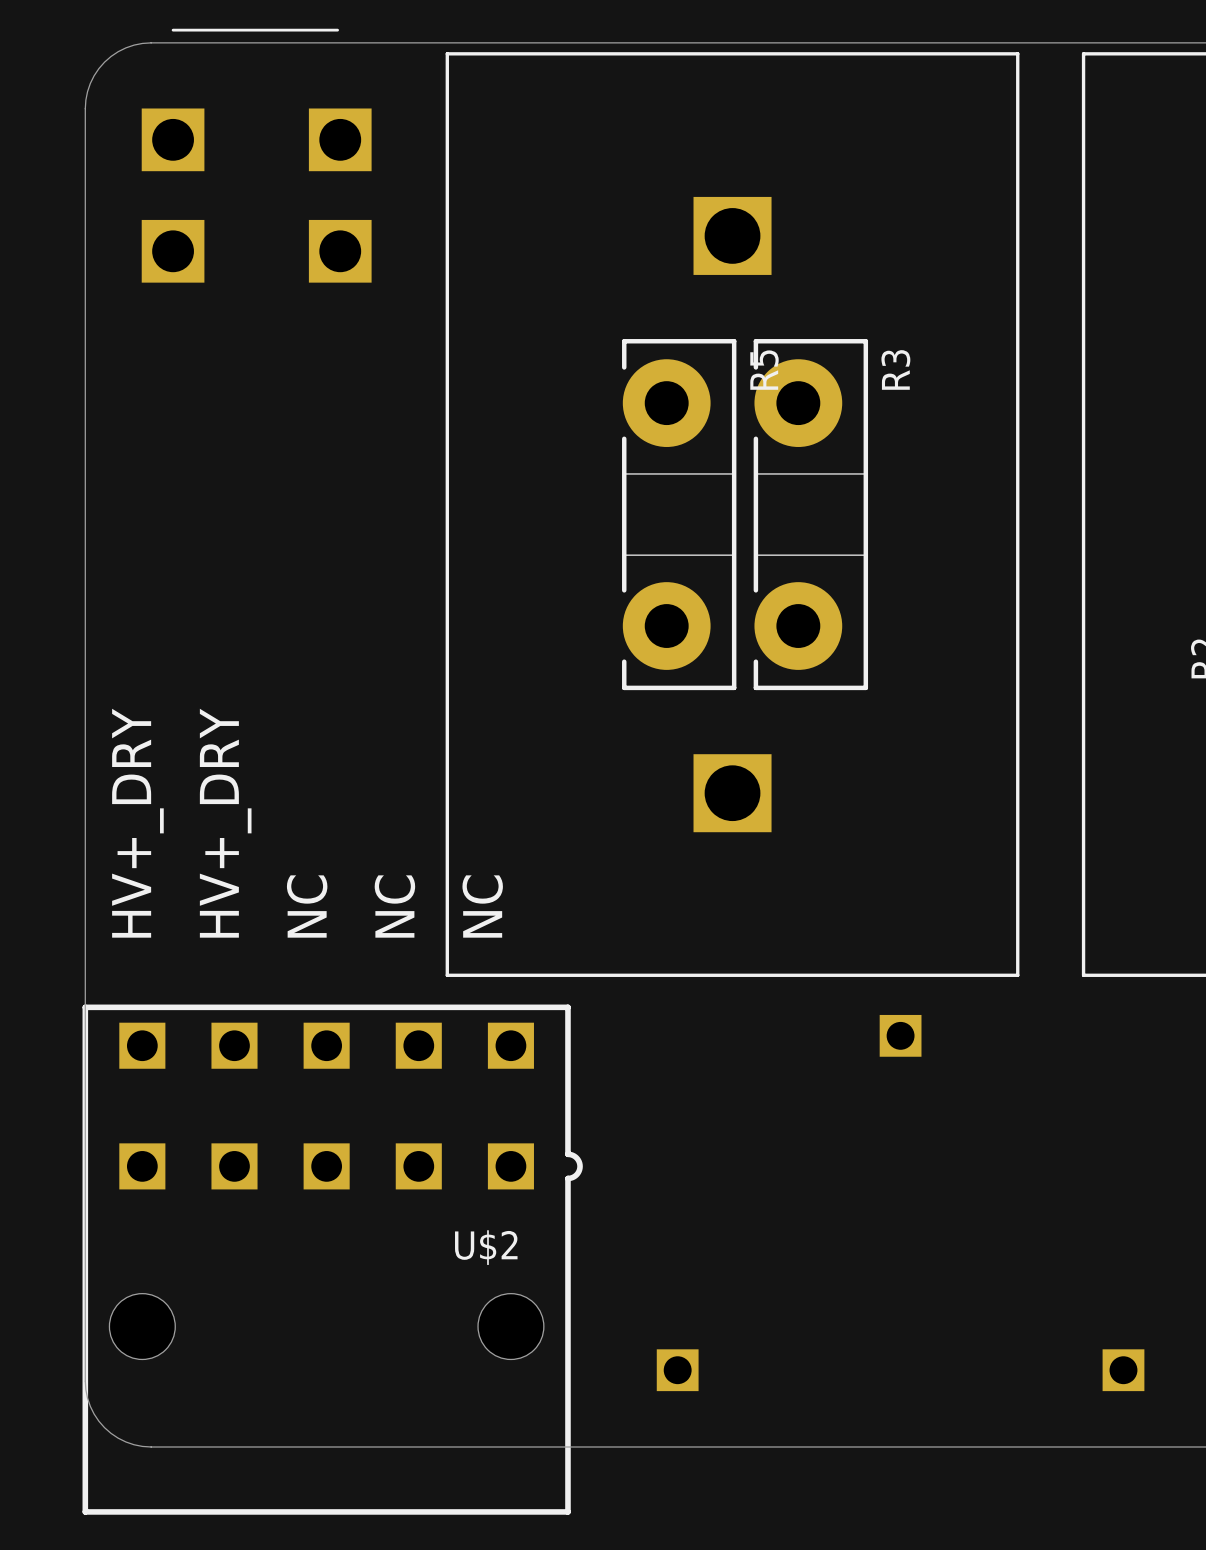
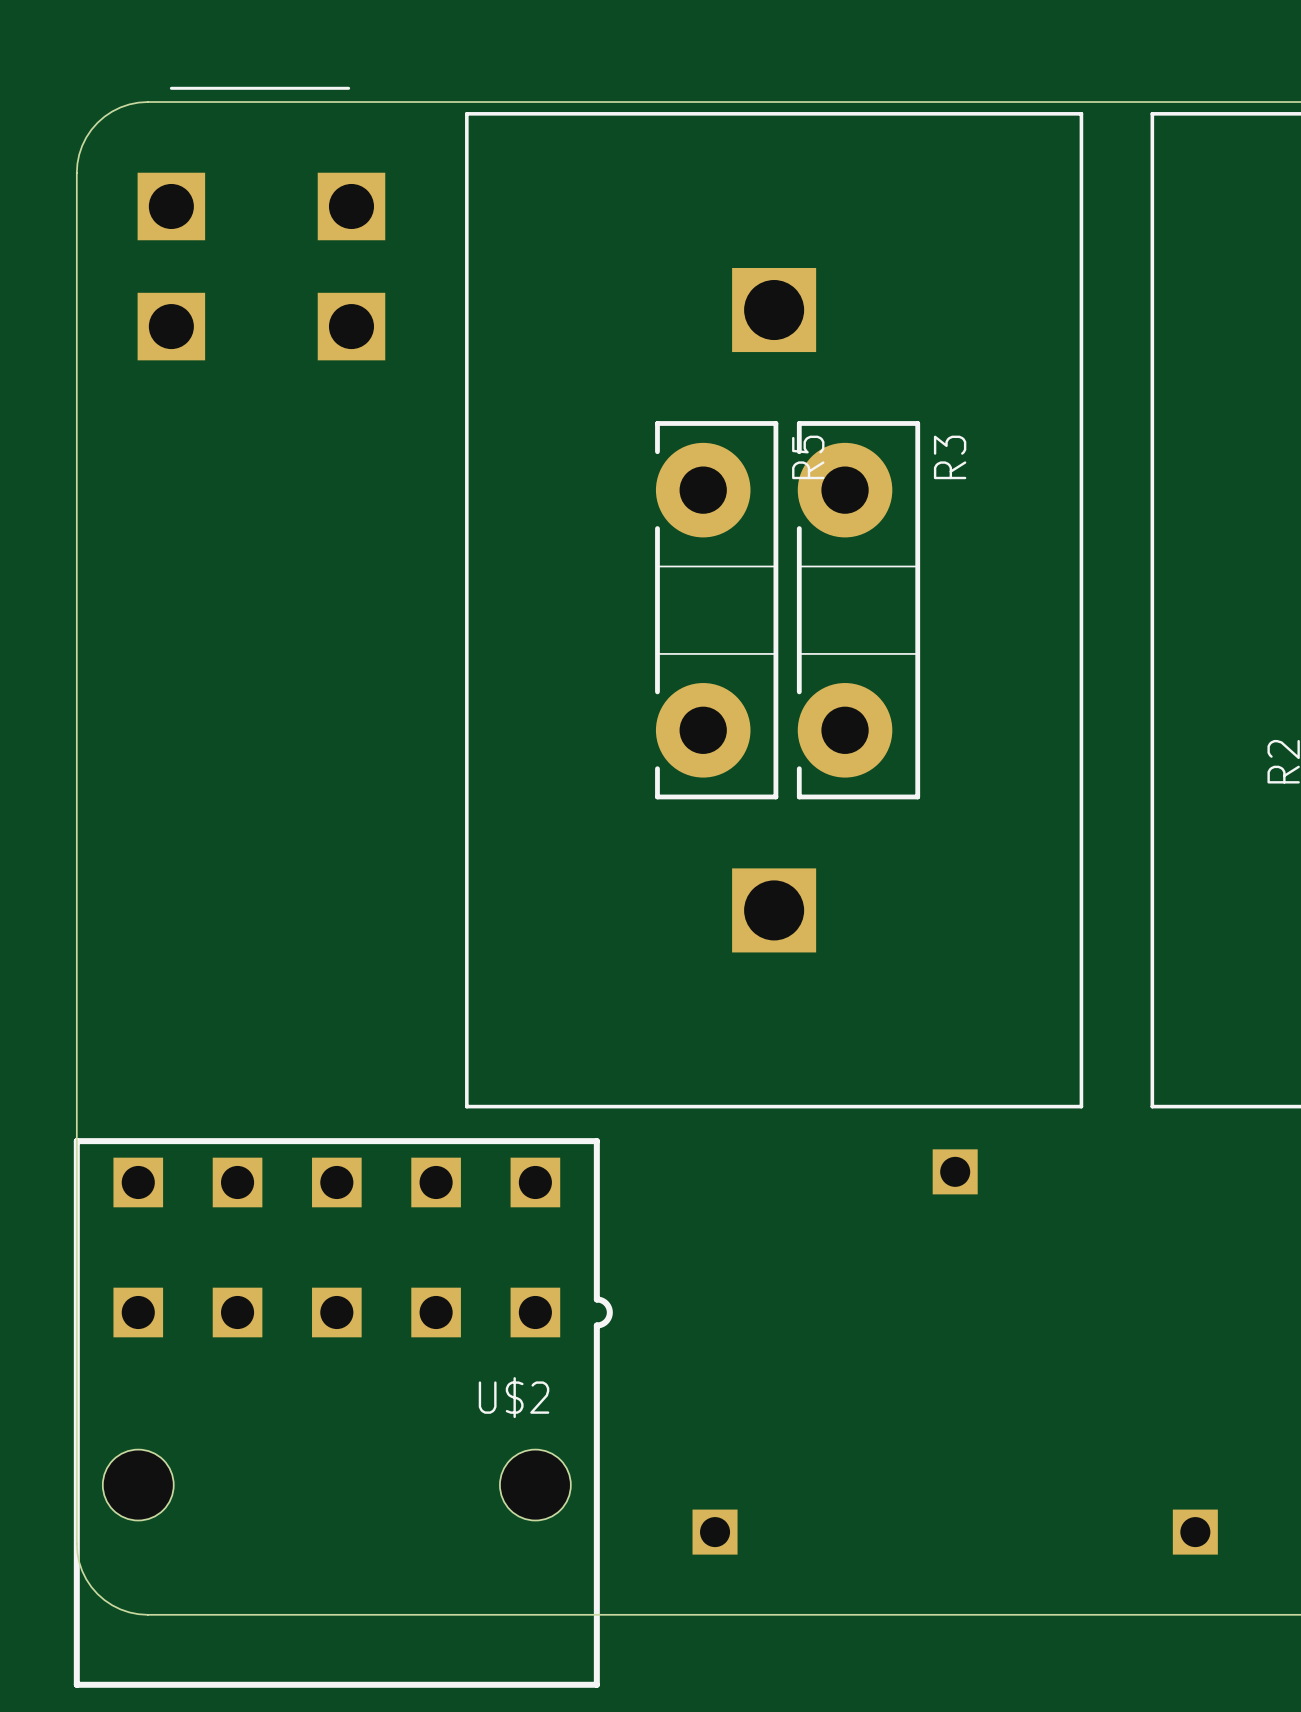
text: HV+_DRY (137, 823) -> none
text: HV+_DRY (225, 823) -> none
text: NC (307, 906) -> none
text: NC (394, 906) -> none
text: NC (482, 906) -> none

